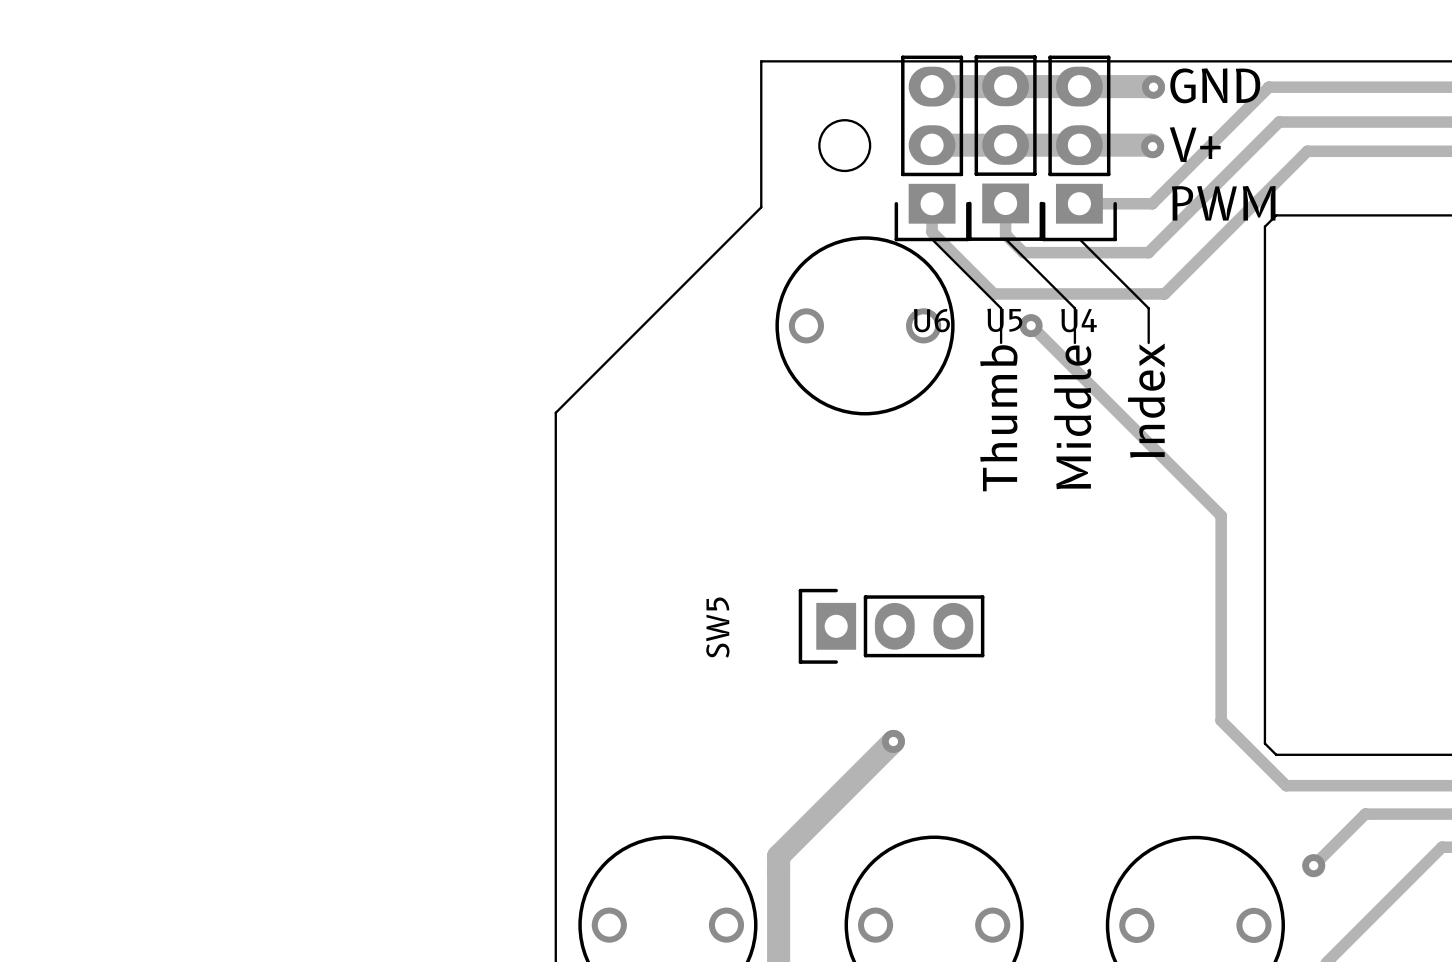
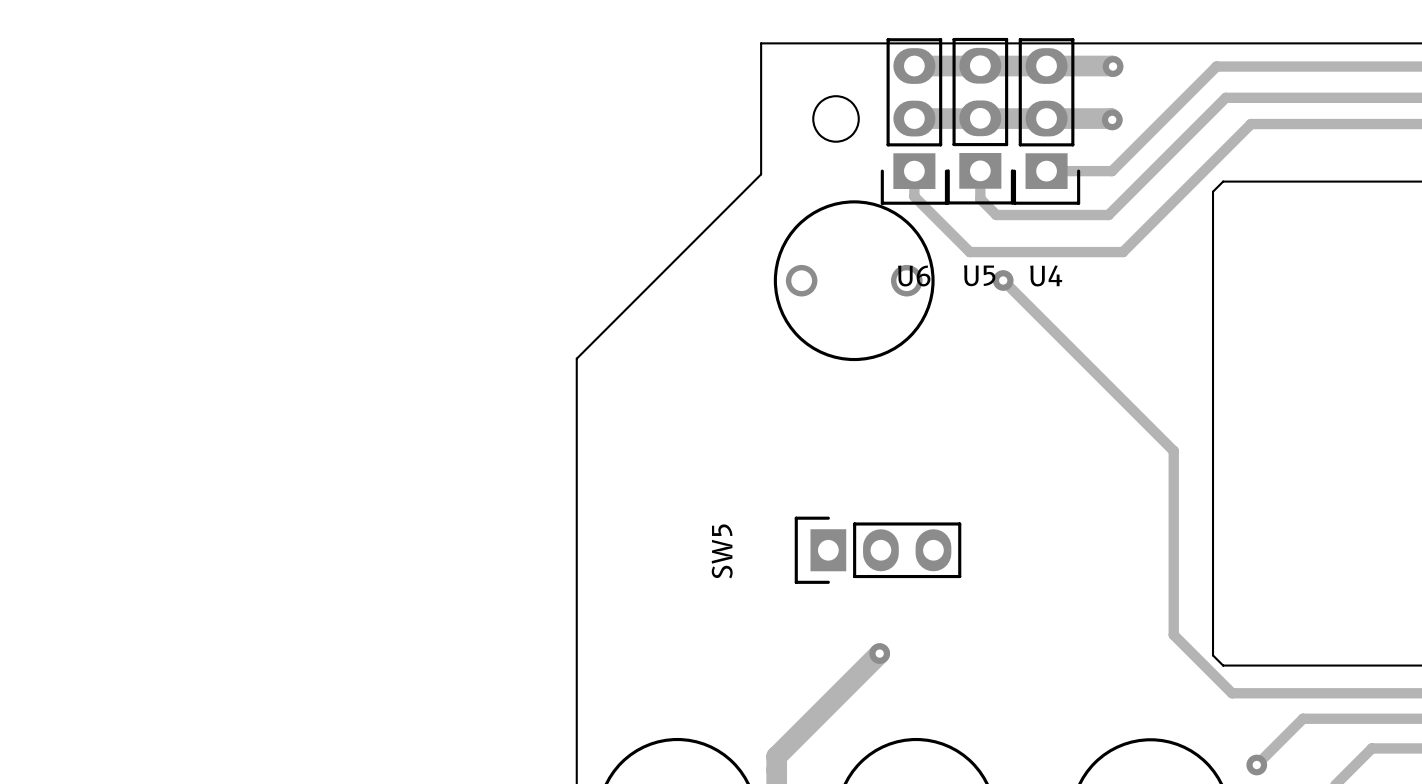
text: GND (1215, 85) -> none
text: V+ (1195, 144) -> none
text: PWM (1223, 203) -> none
line: (931, 239) (1001, 308) (1001, 342) -> none
line: (1005, 239) (1074, 308) (1074, 342) -> none
line: (1079, 239) (1148, 308) (1148, 342) -> none
text: Index (1146, 400) -> none
text: Middle (1072, 417) -> none
text: Thumb (998, 418) -> none

